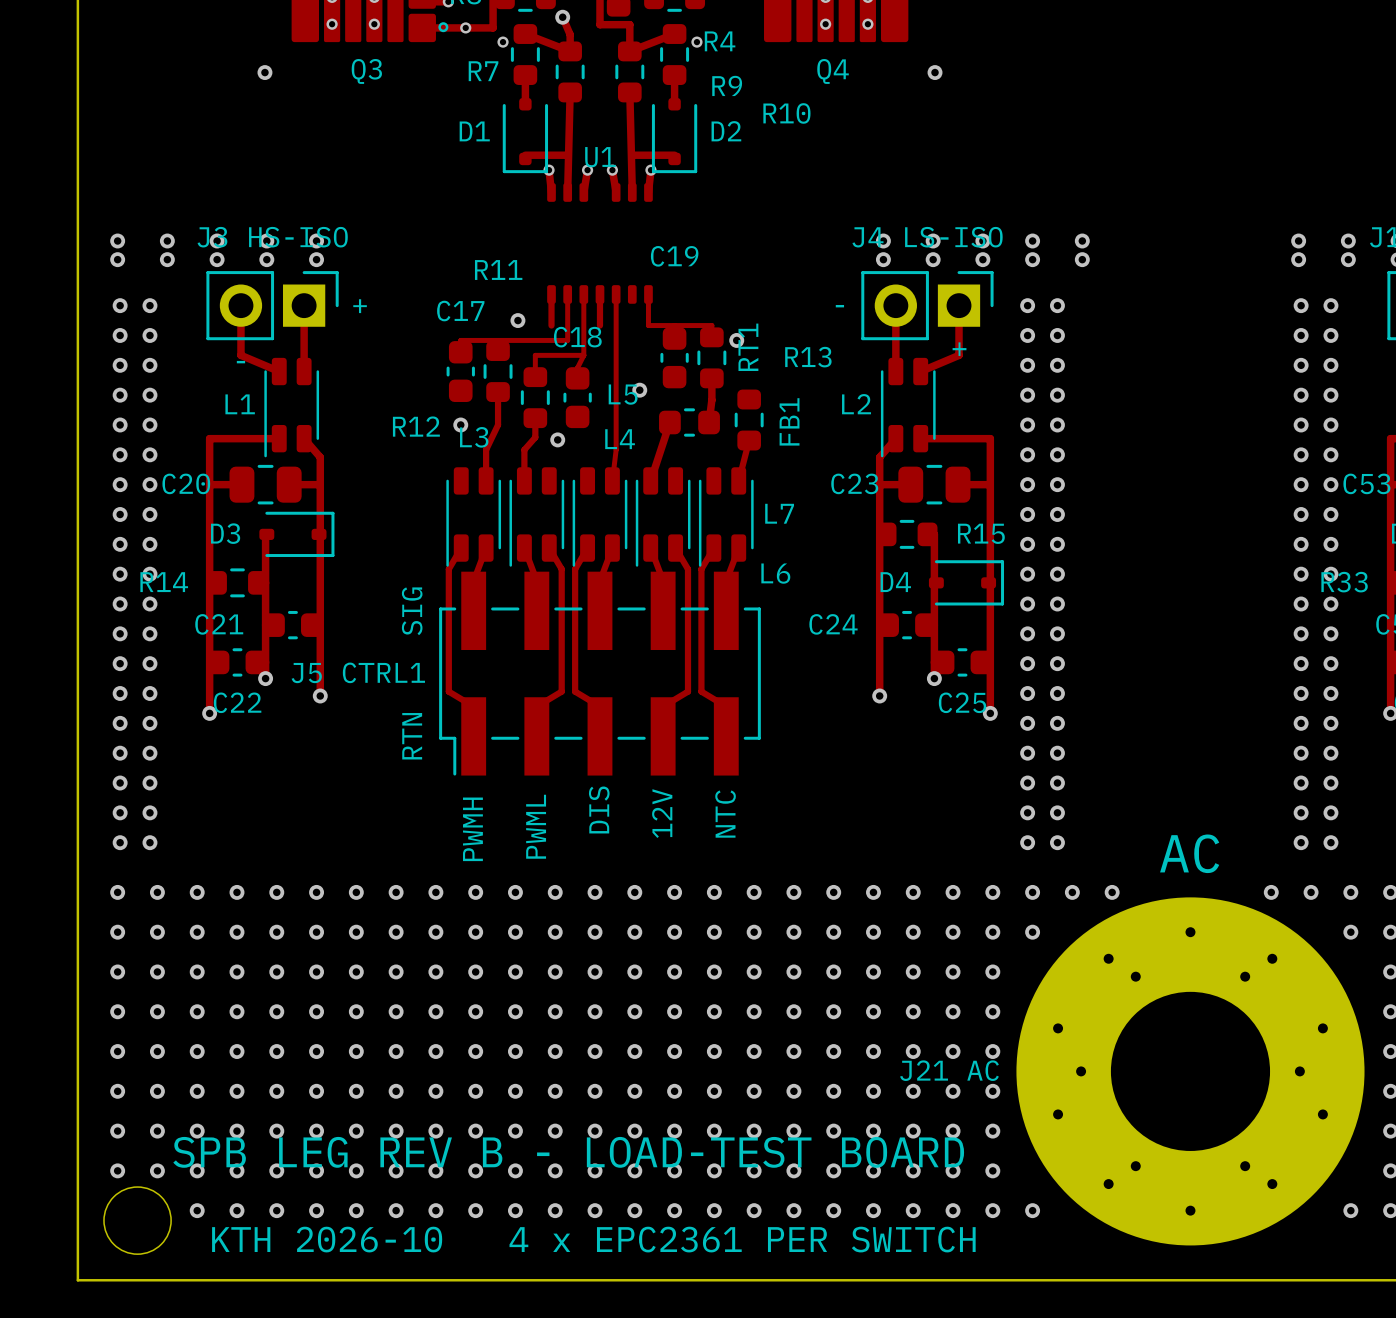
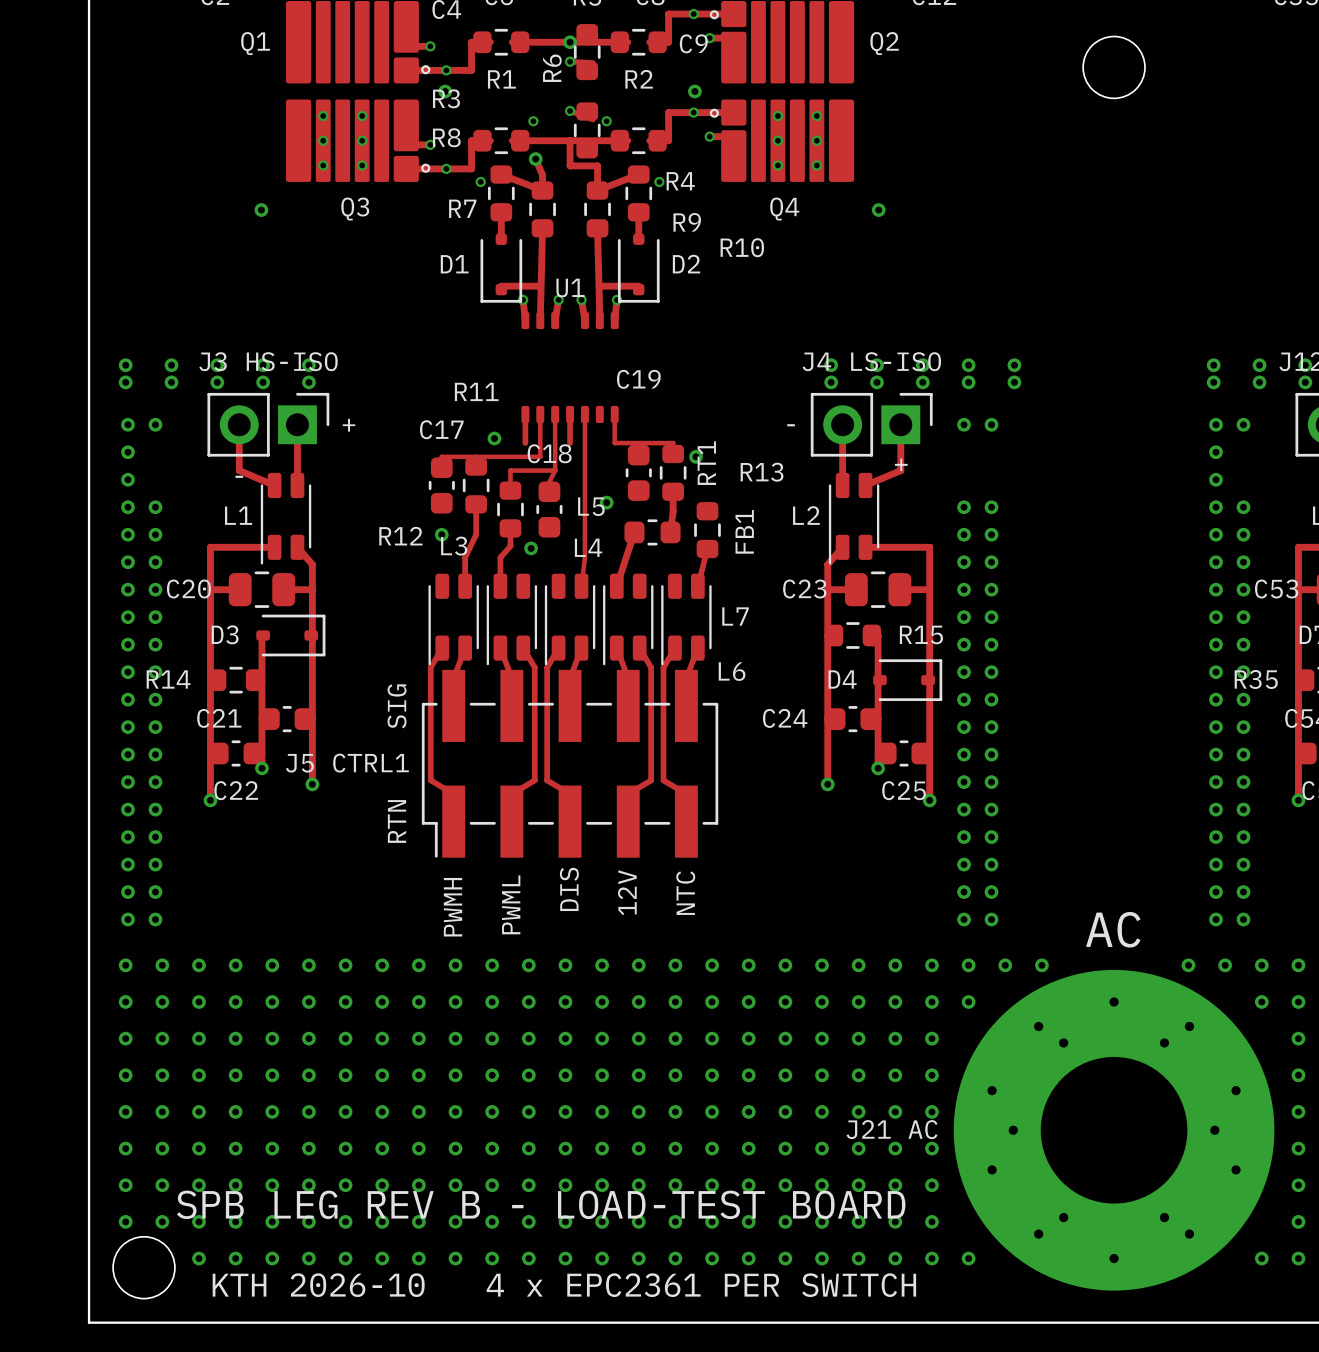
via: (149, 335) -> none
via: (1027, 335) -> none
via: (1057, 335) -> none
via: (1330, 335) -> none
via: (149, 365) -> none
via: (1027, 365) -> none
via: (1057, 365) -> none
via: (1330, 365) -> none
text: R33 (1344, 582) -> R35 (1256, 679)

